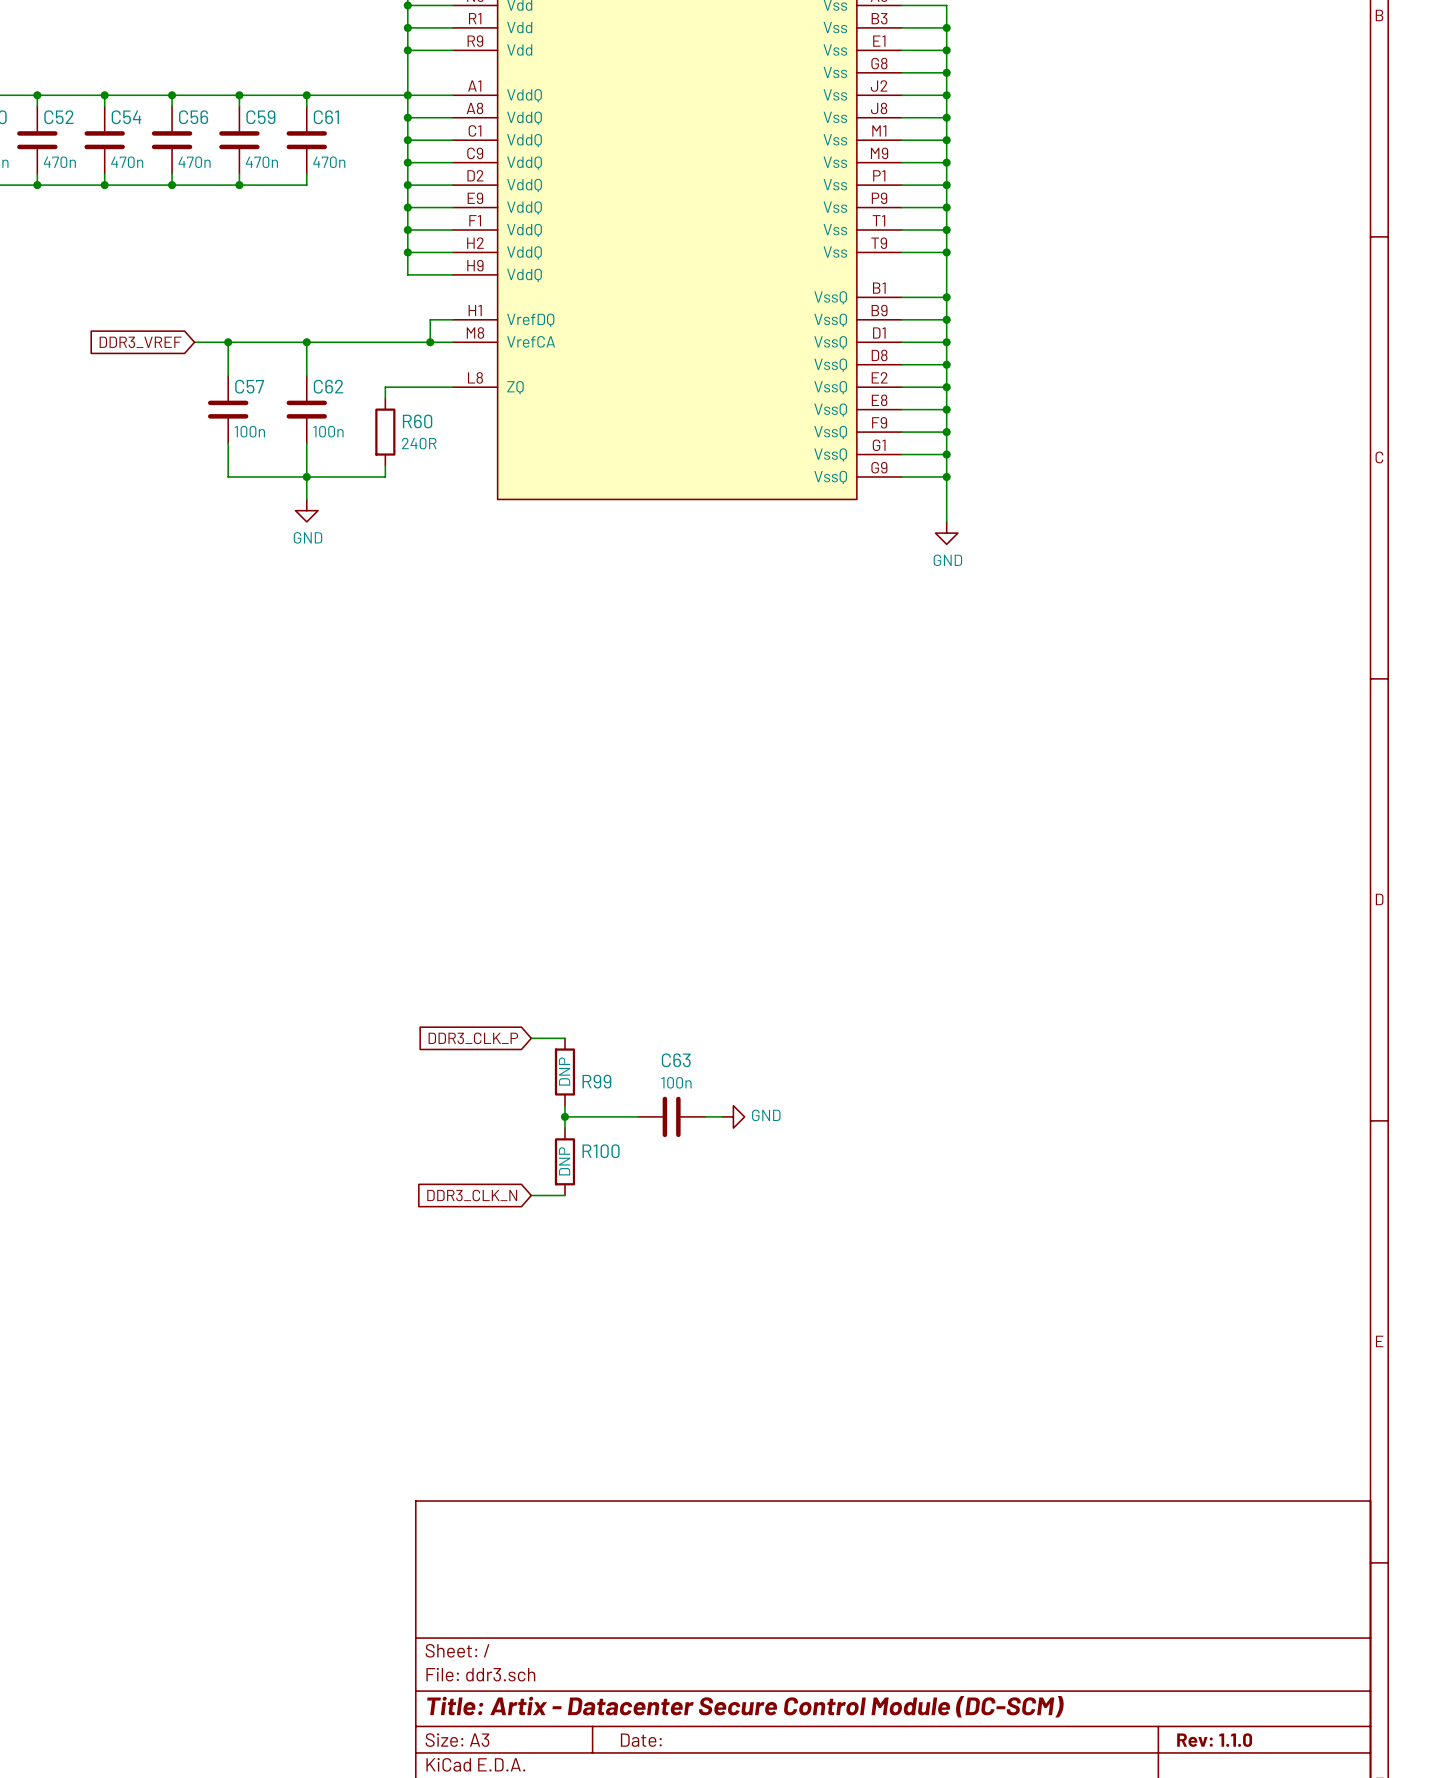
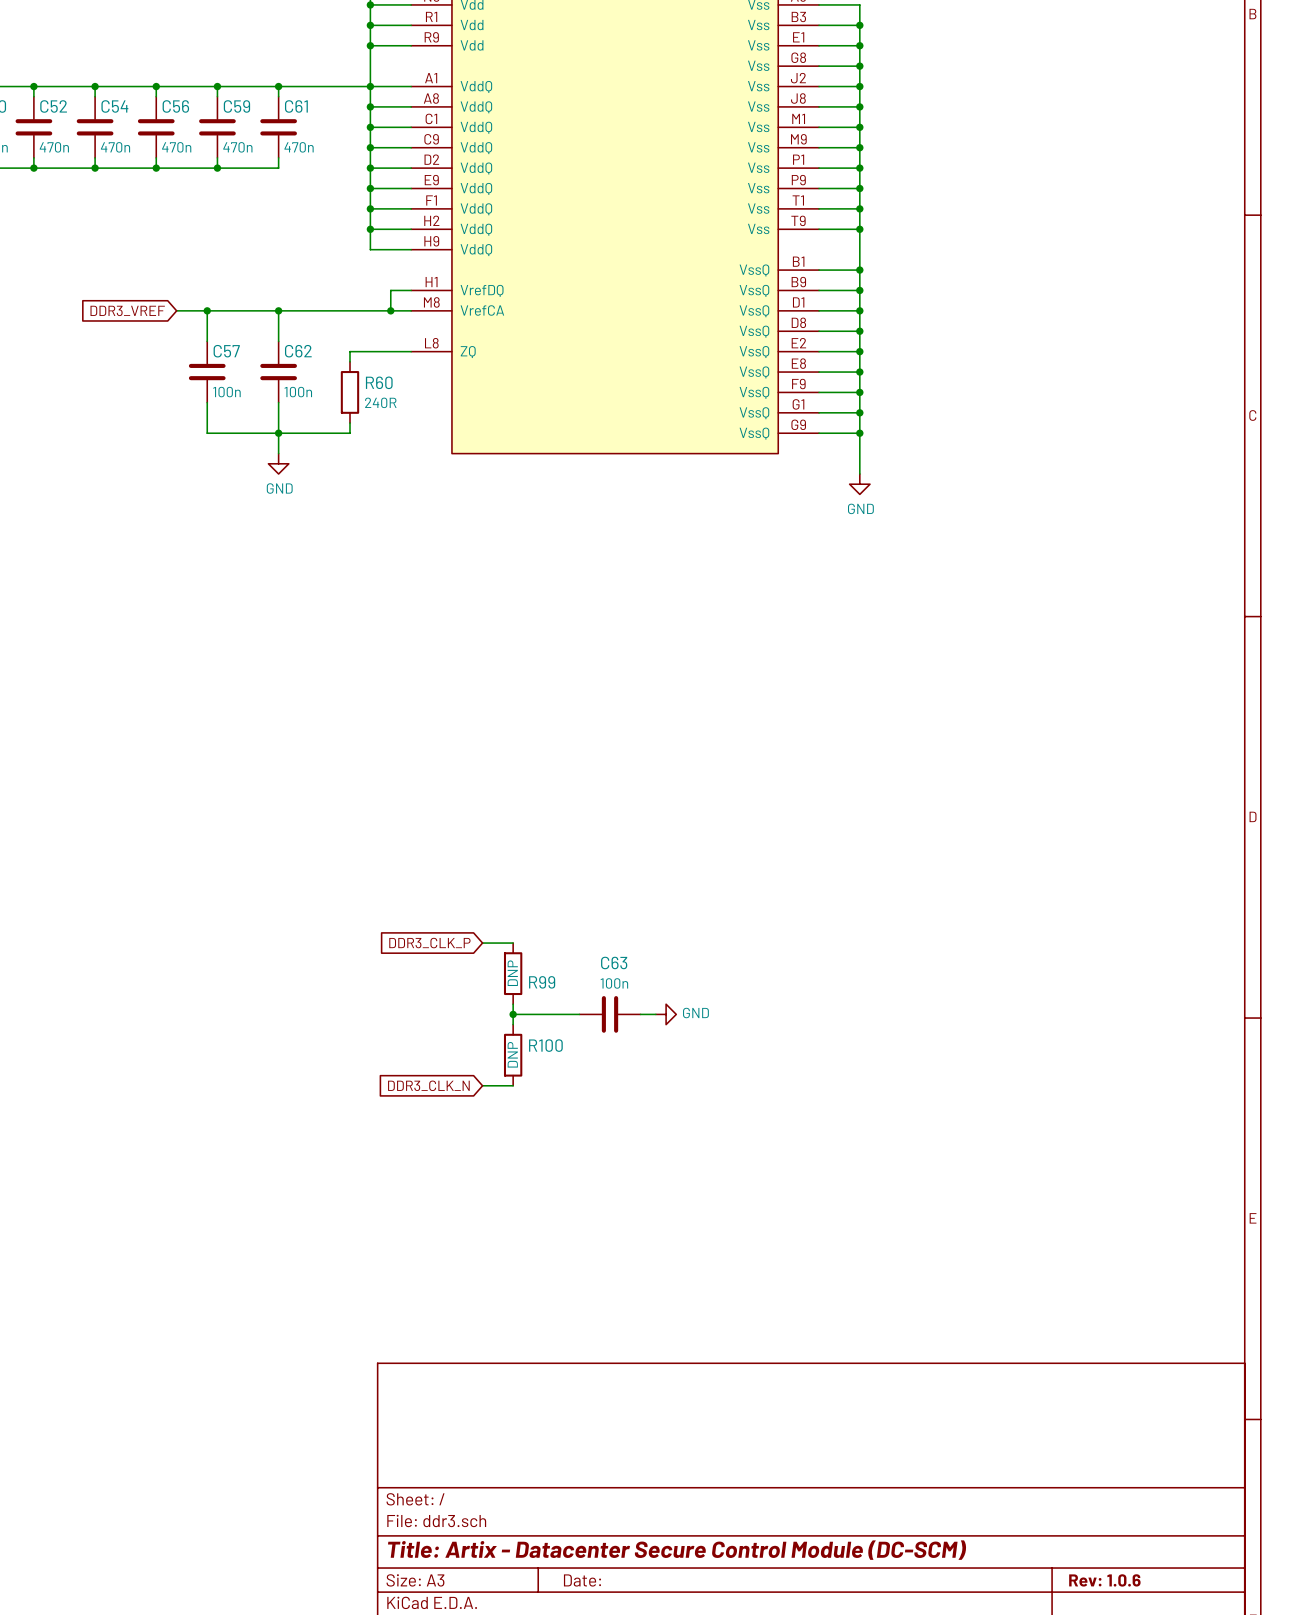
title block: Rev: 1.1.0 (1214, 1740) -> Rev: 1.0.6 (1104, 1580)

